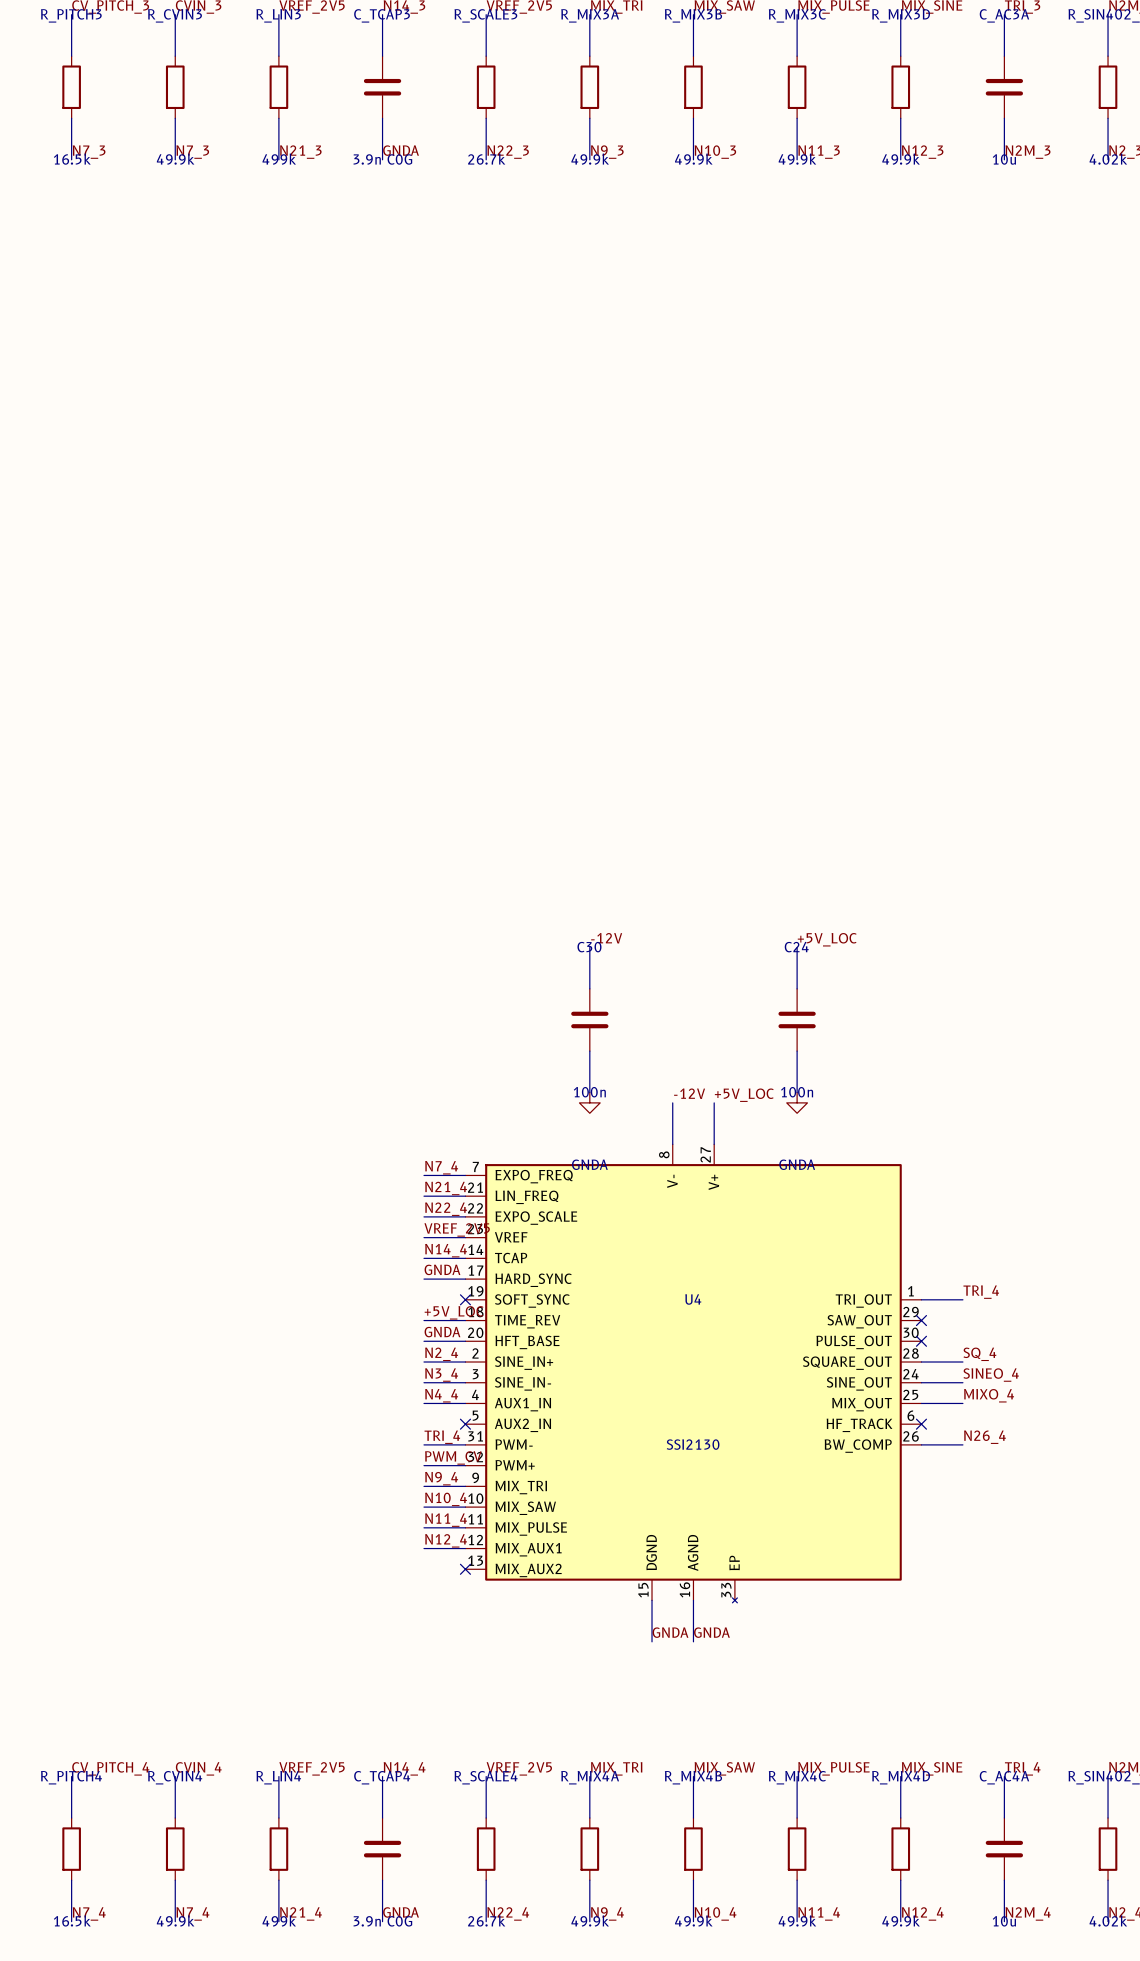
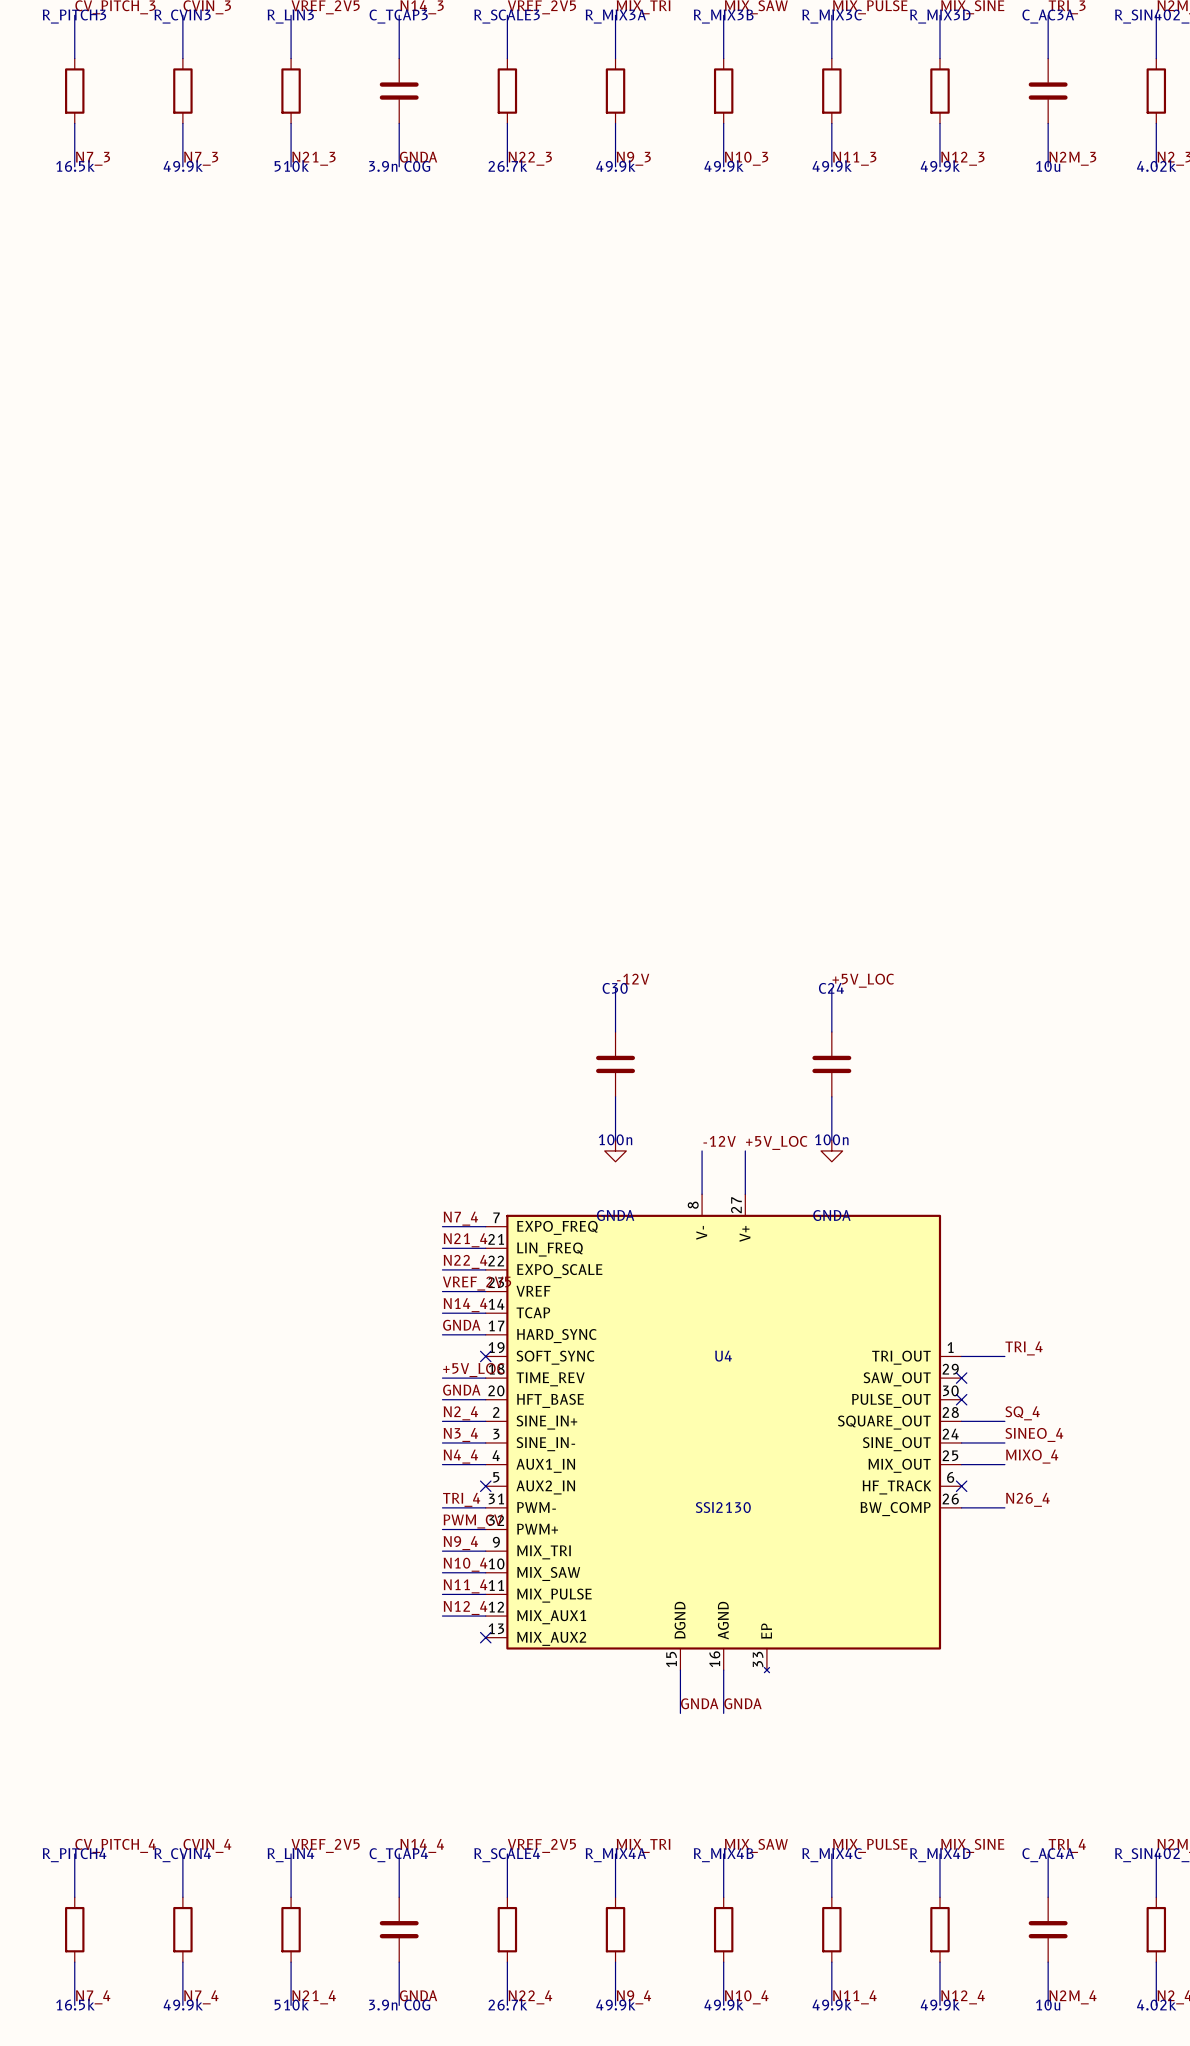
R_LIN3 value: 499k (279, 159) -> 510k (291, 166)
R_LIN4 value: 499k (279, 1920) -> 510k (291, 2004)

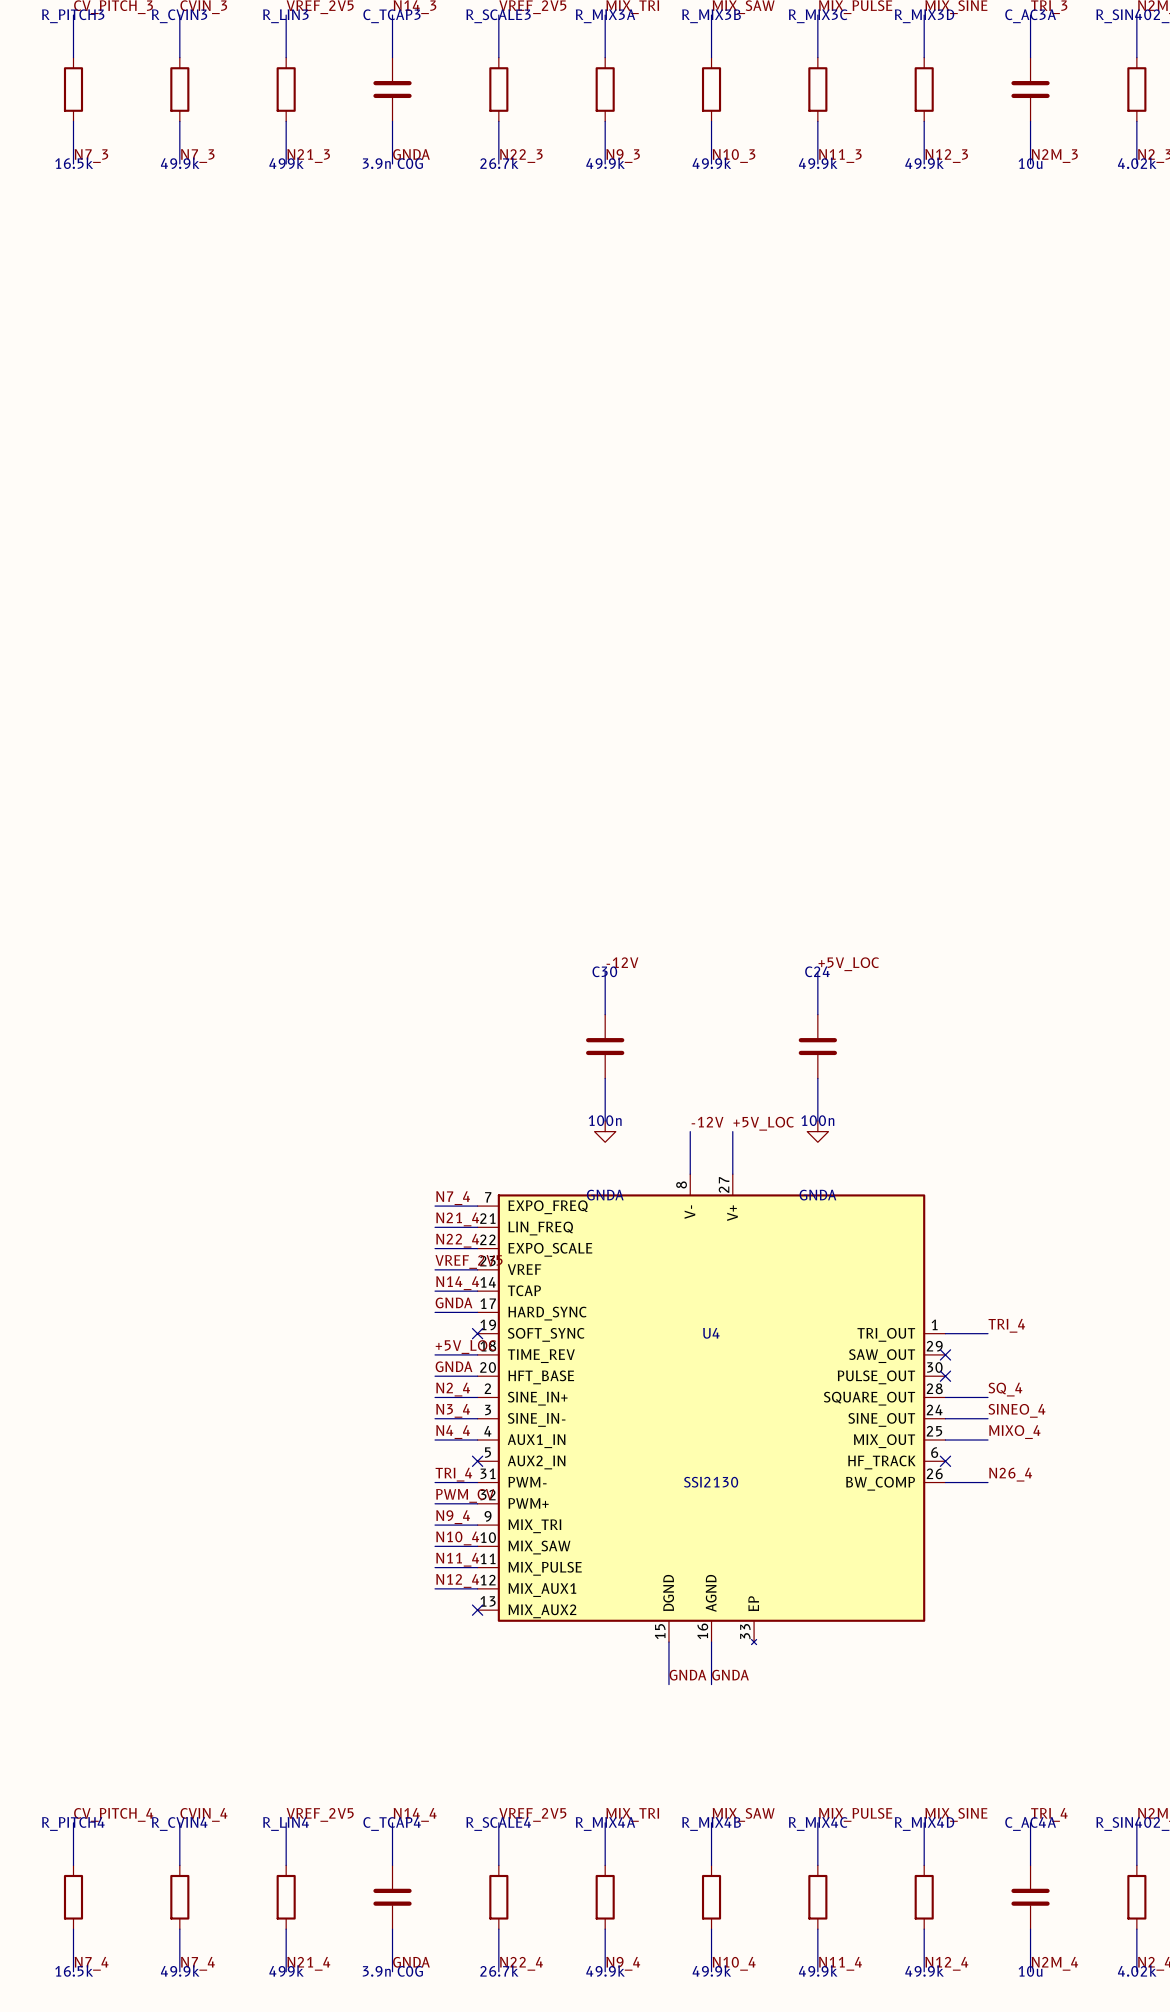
R_LIN3 value: 510k (291, 166) -> 499k (286, 163)
R_LIN4 value: 510k (291, 2004) -> 499k (286, 1971)

